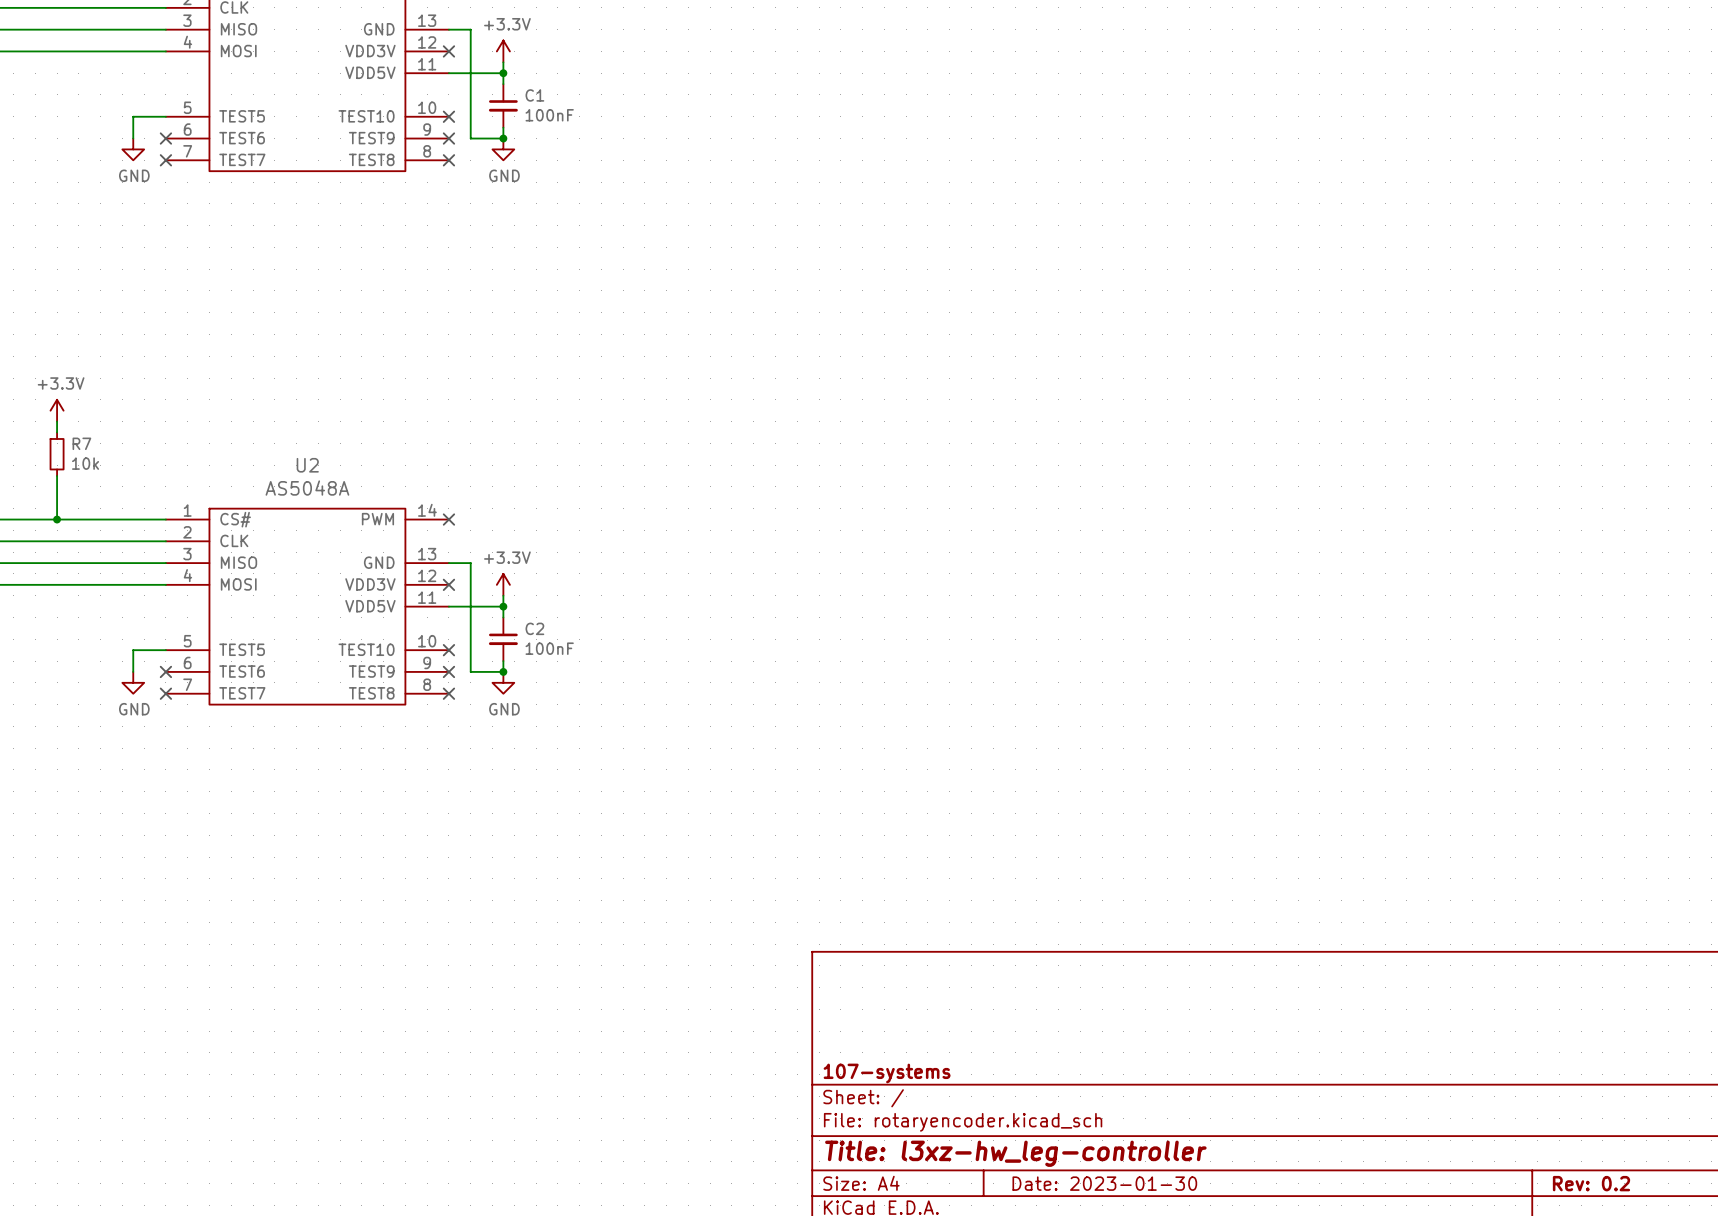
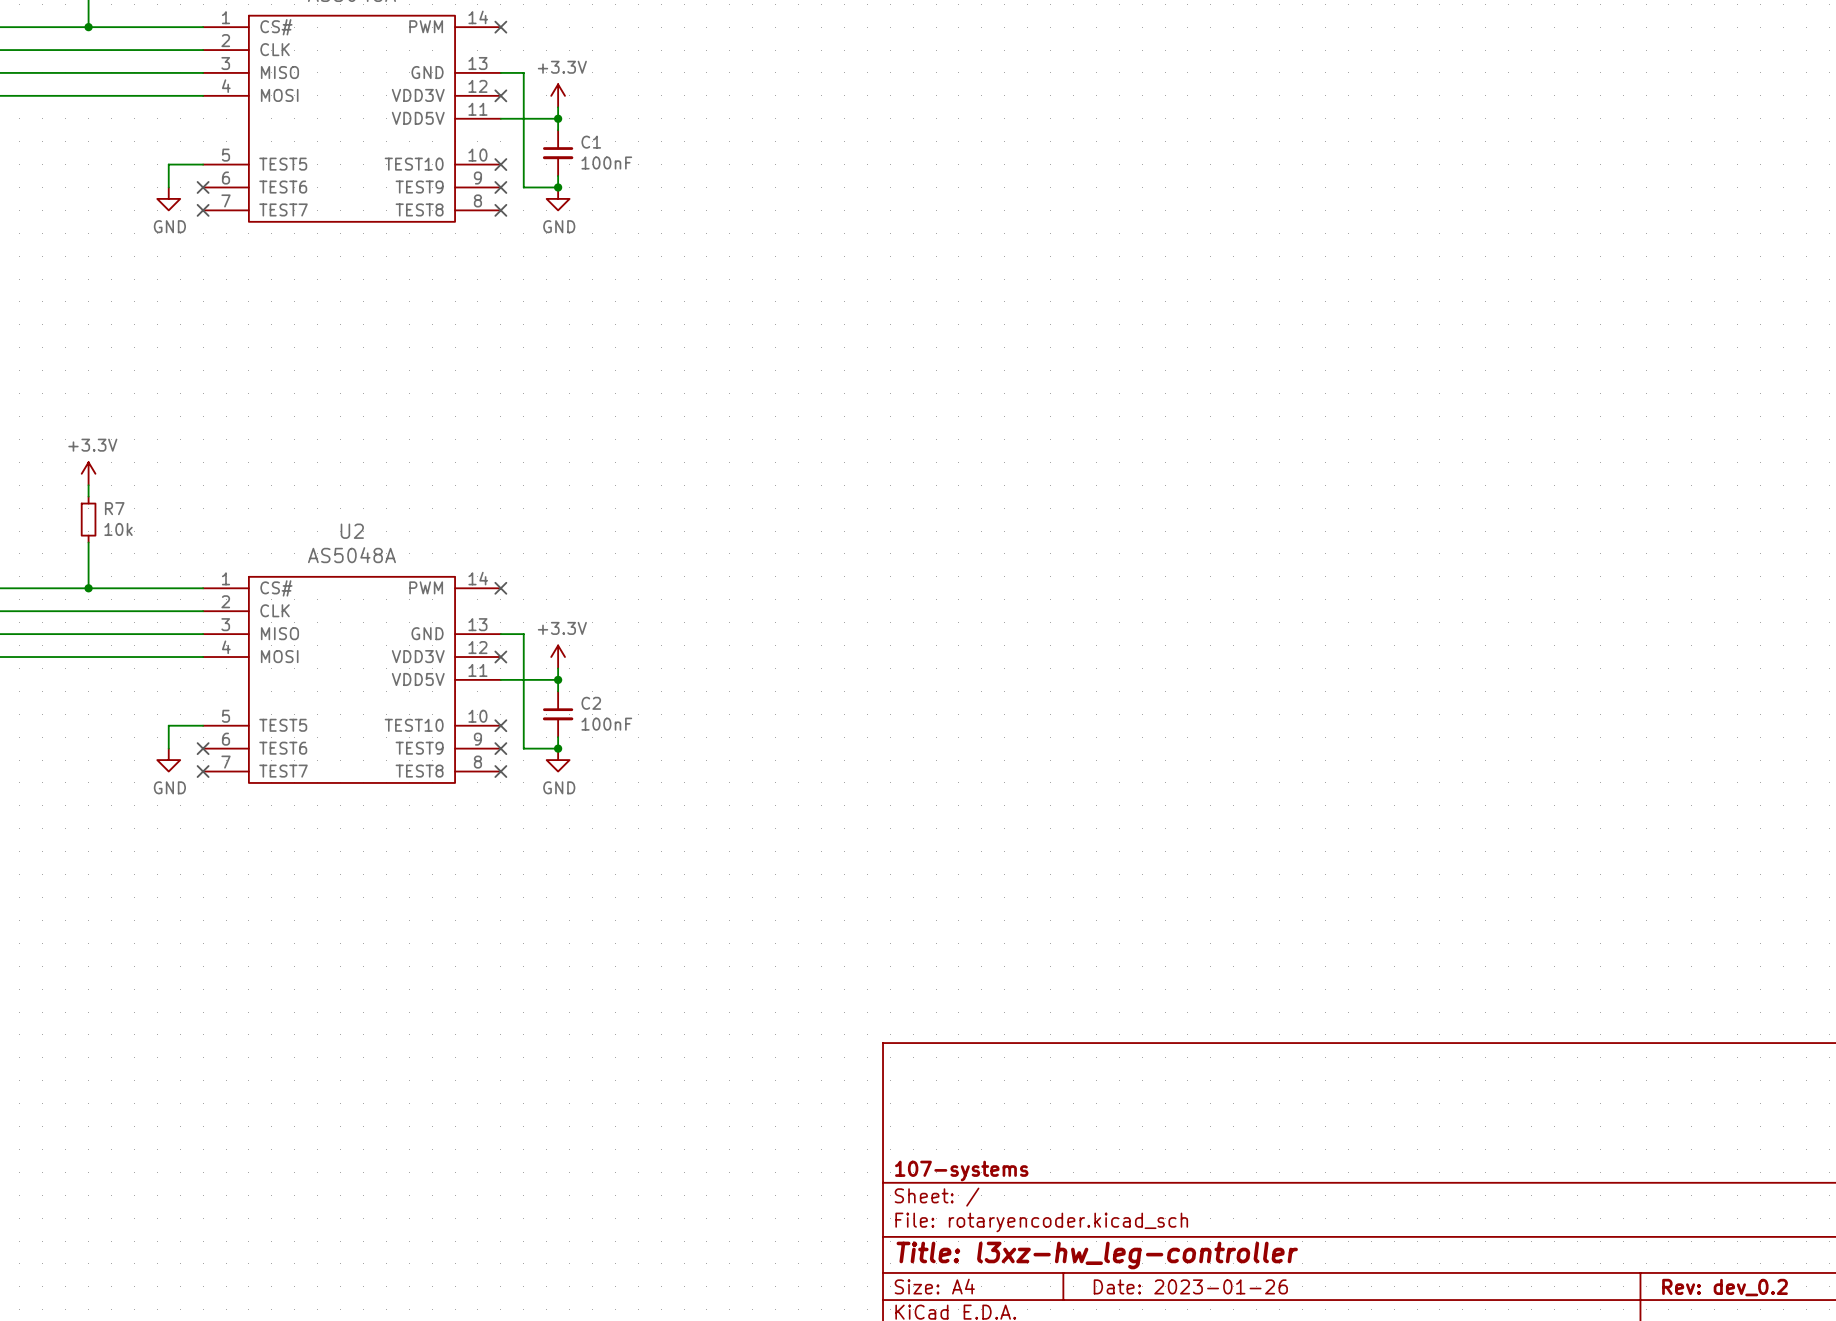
title block: Date: 2023-01-30 (1104, 1183) -> Date: 2023-01-26 (1190, 1286)
title block: Rev: 0.2 (1591, 1183) -> Rev: dev_0.2 (1725, 1287)

